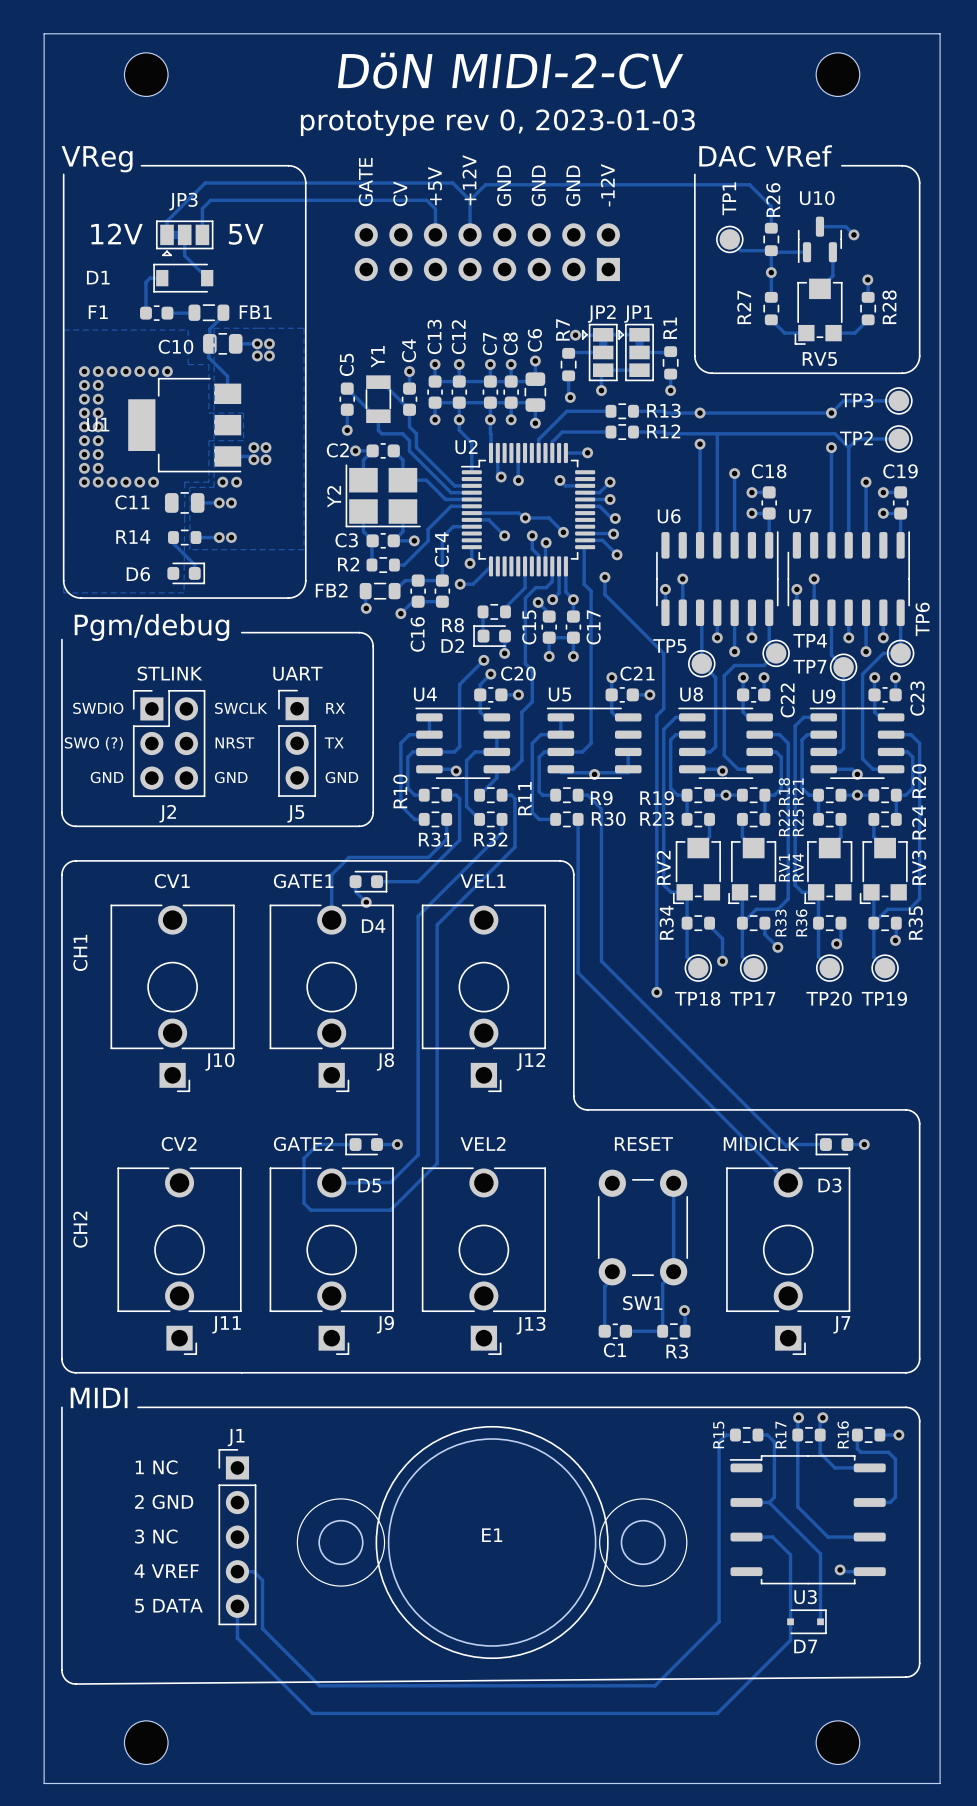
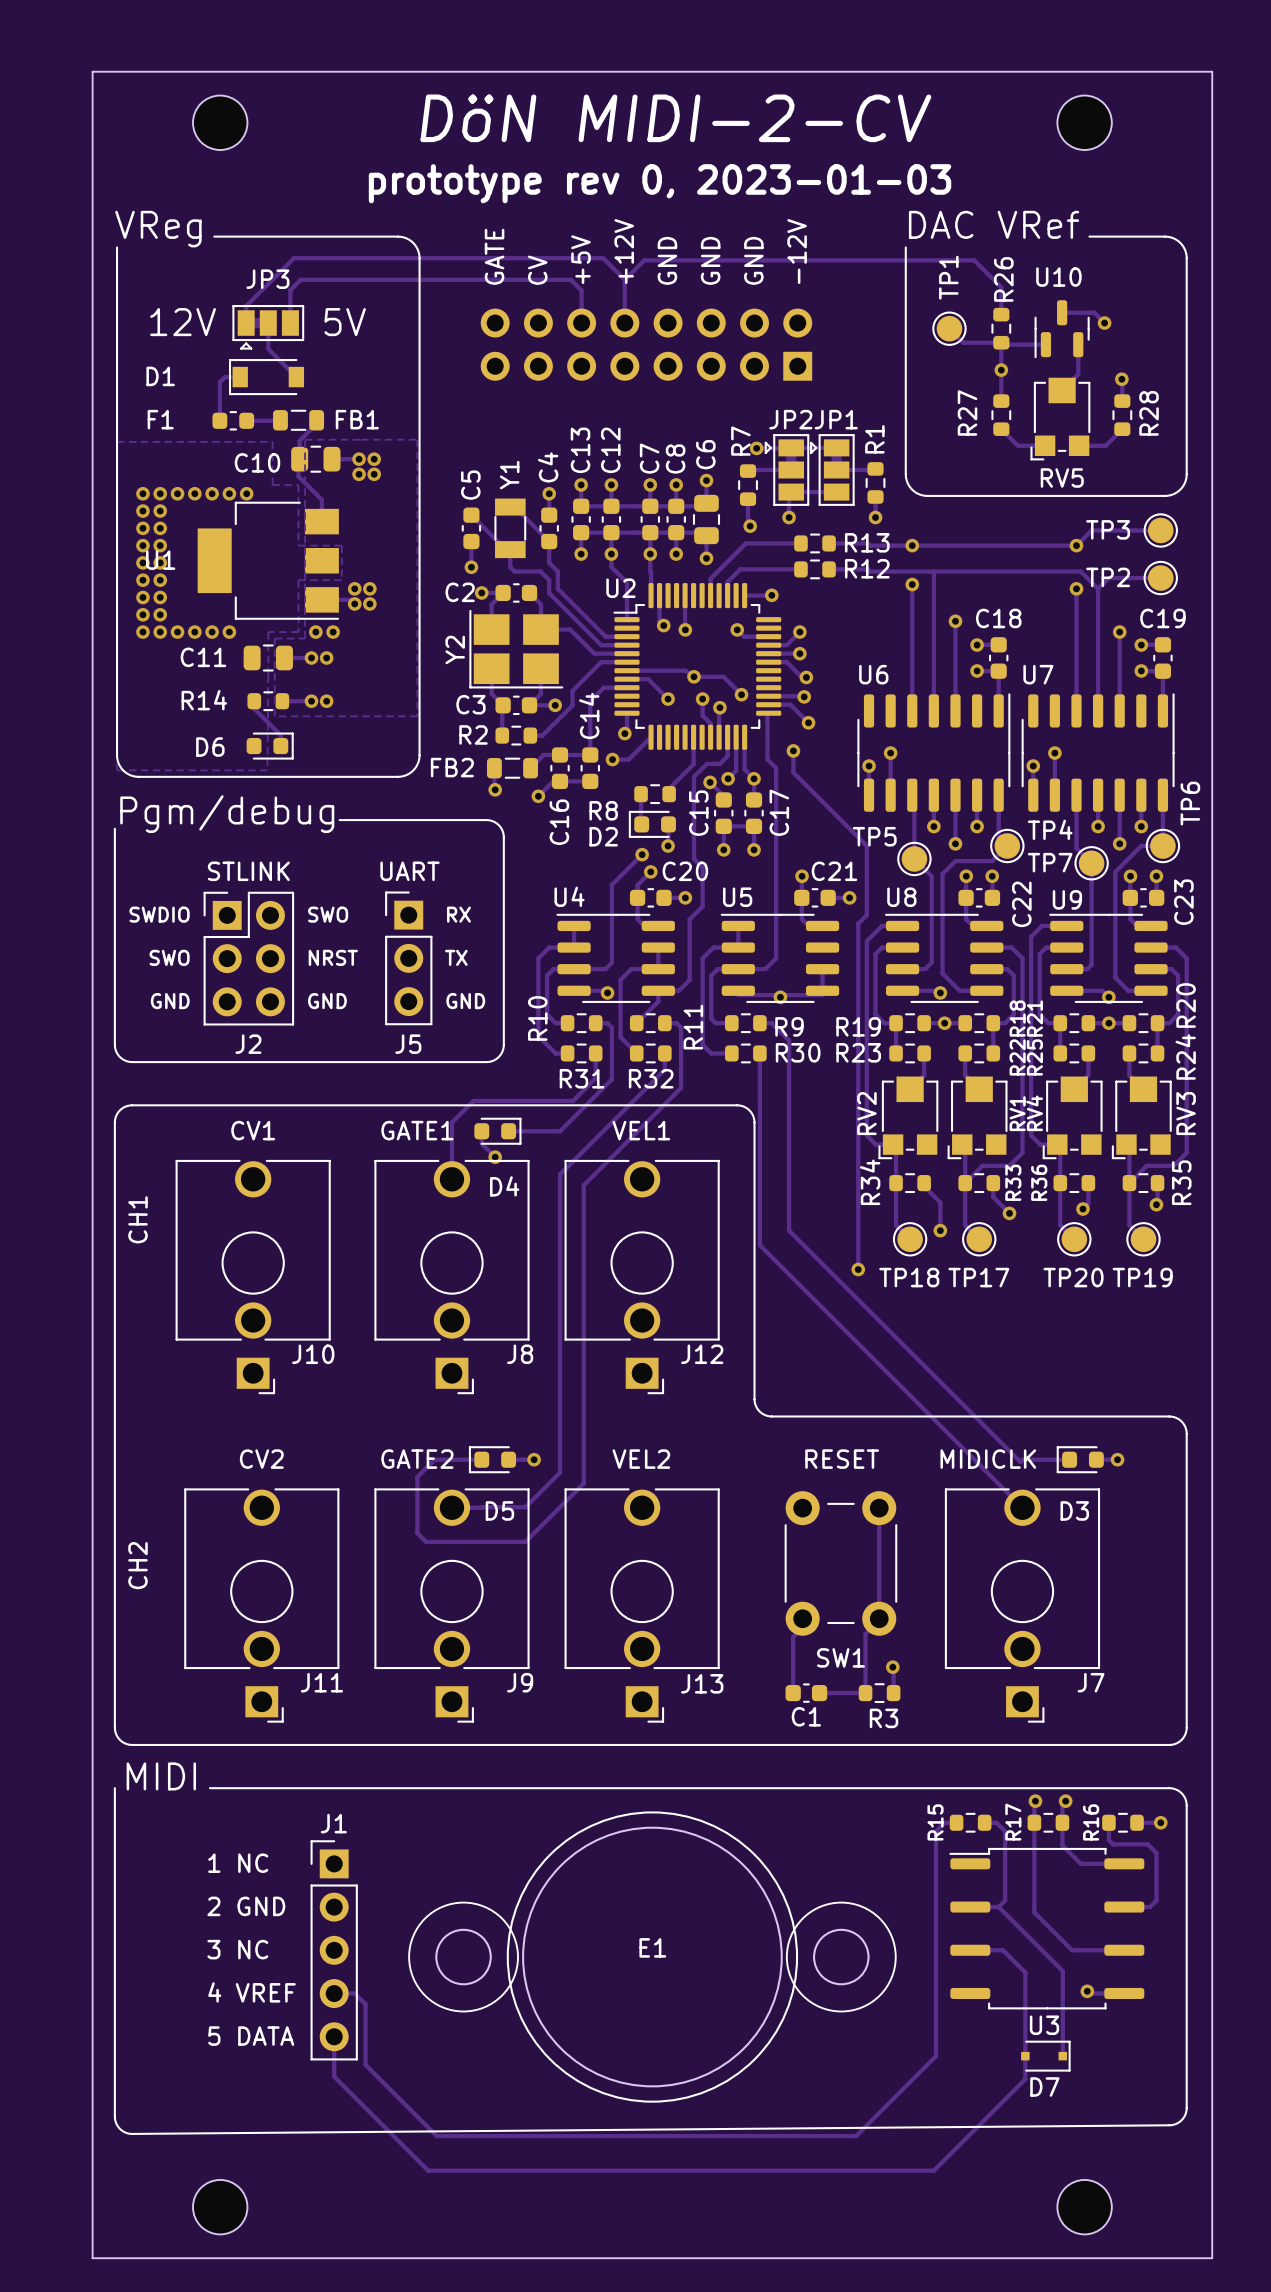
text: SWCLK (241, 708) -> SWO (328, 914)
text: SWO (?) (93, 743) -> SWO (169, 957)

